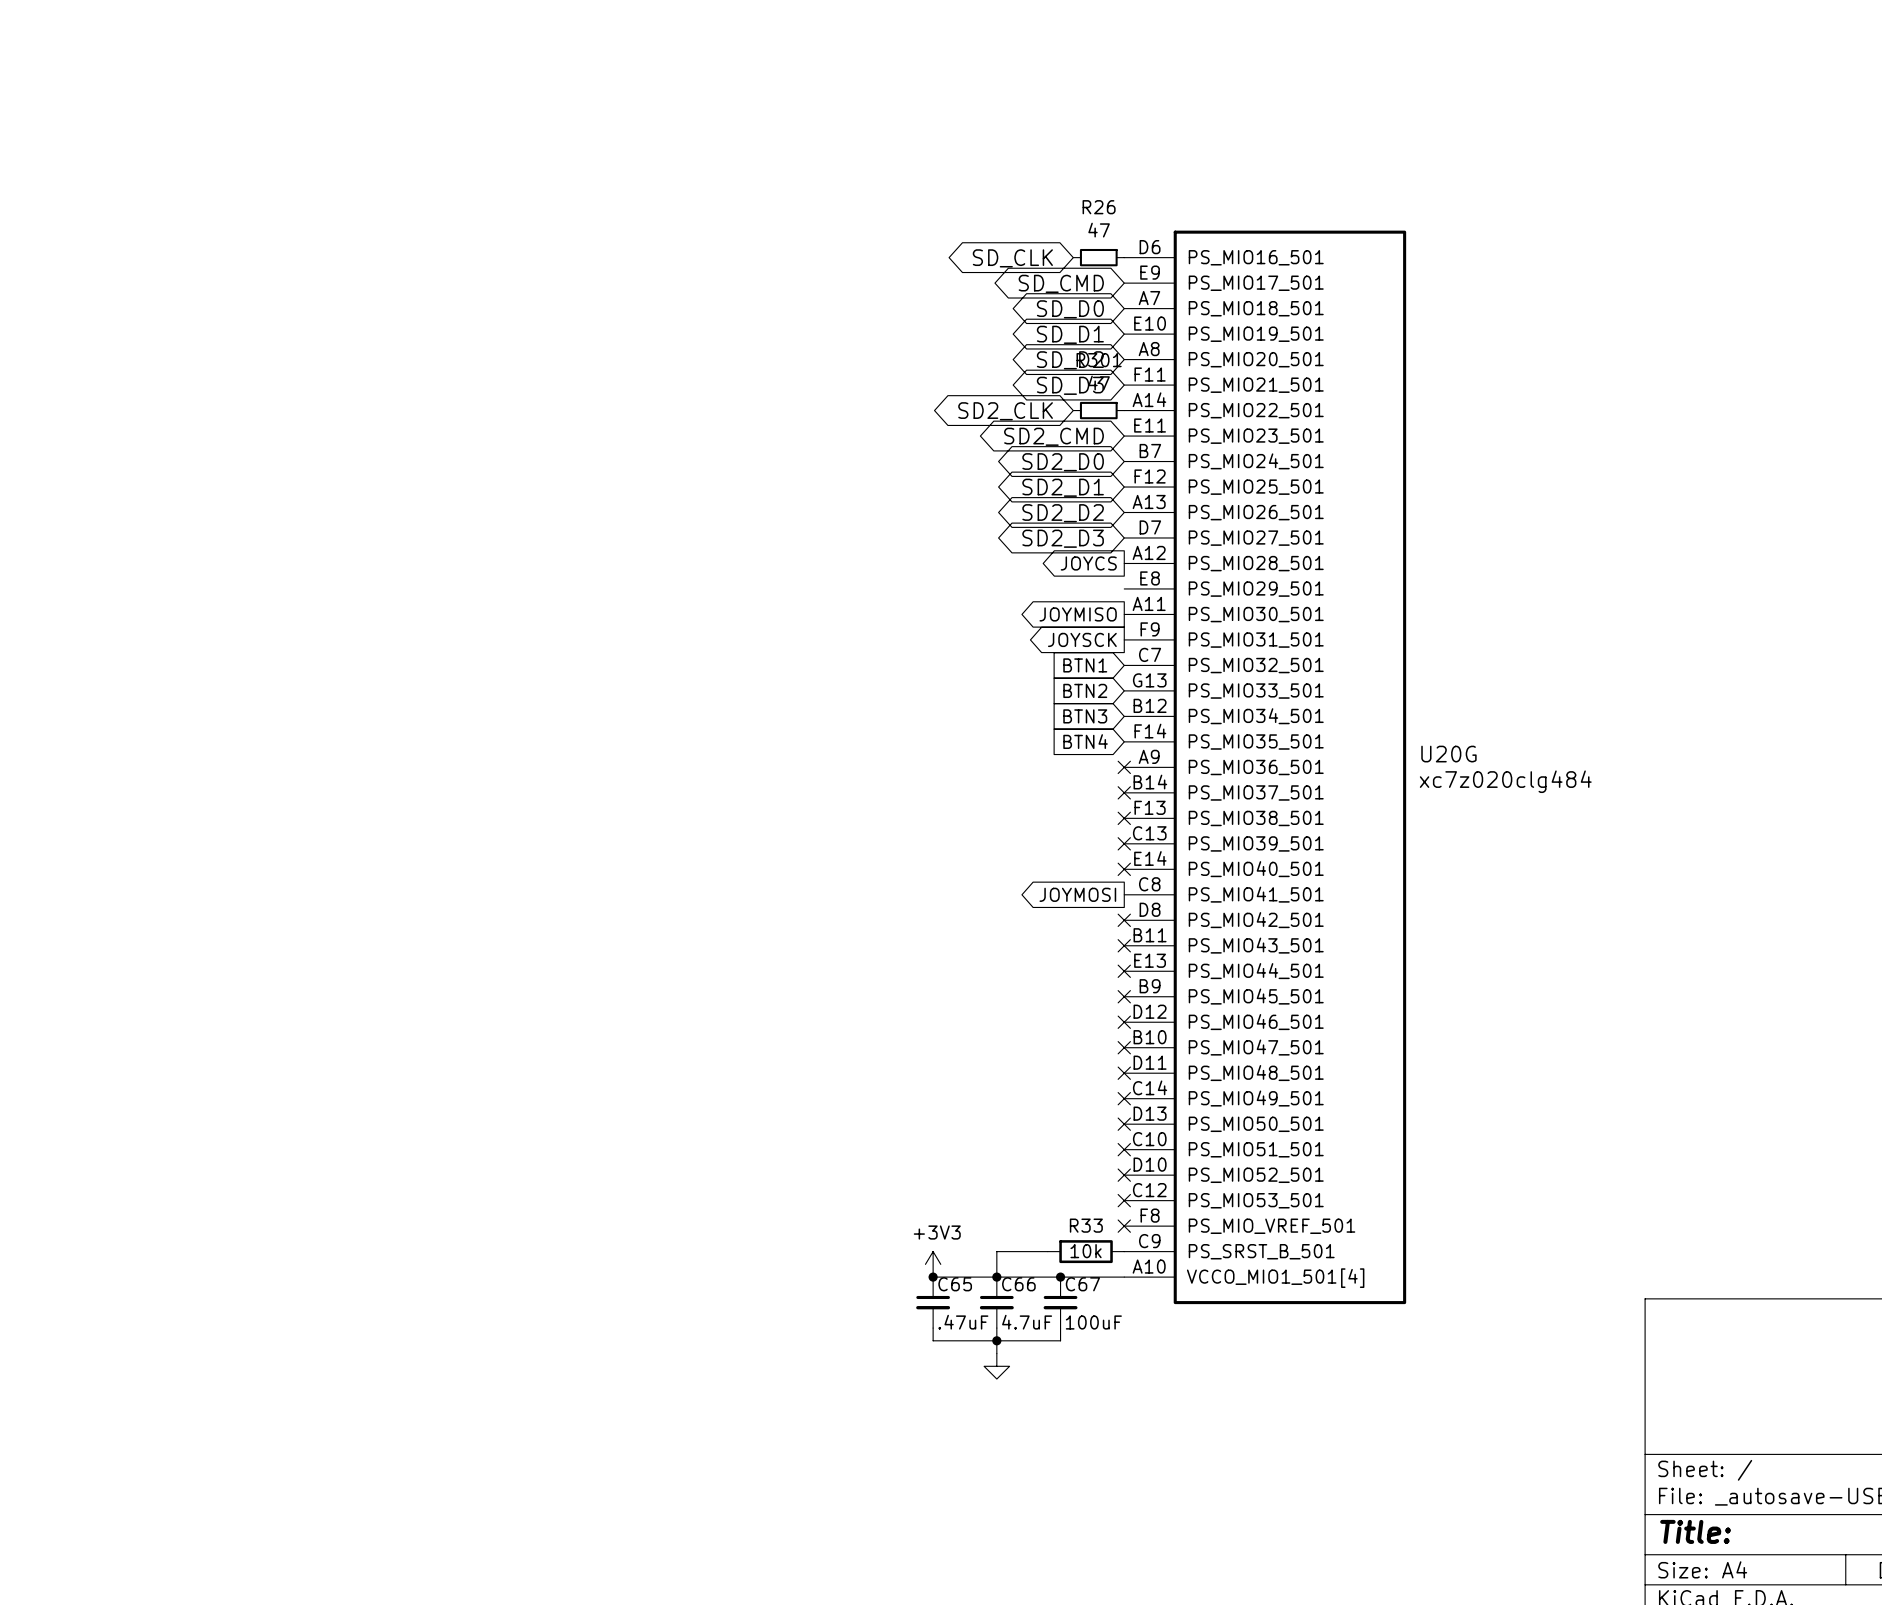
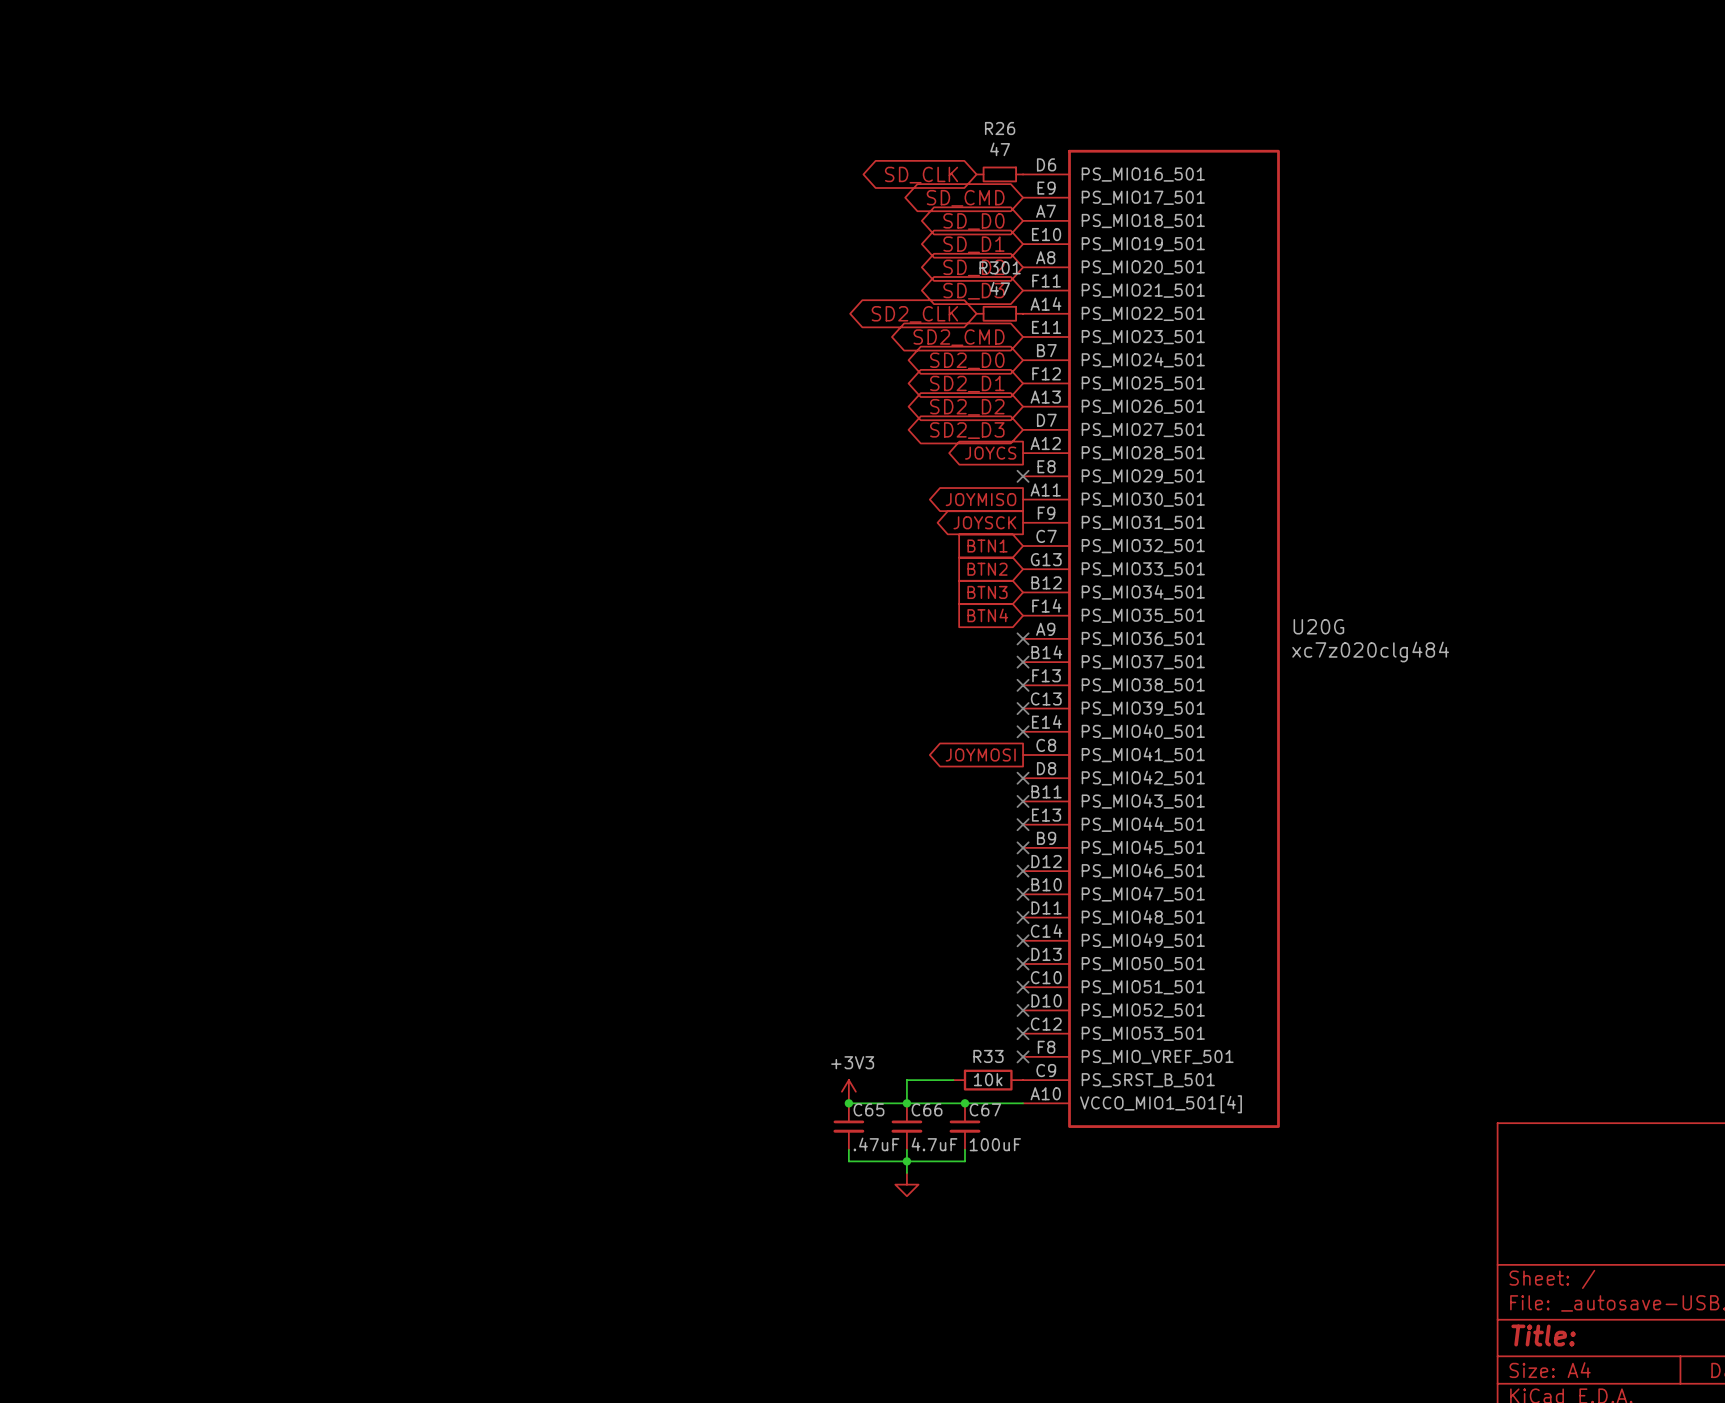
no-connect mark: none -> (1023, 476)

